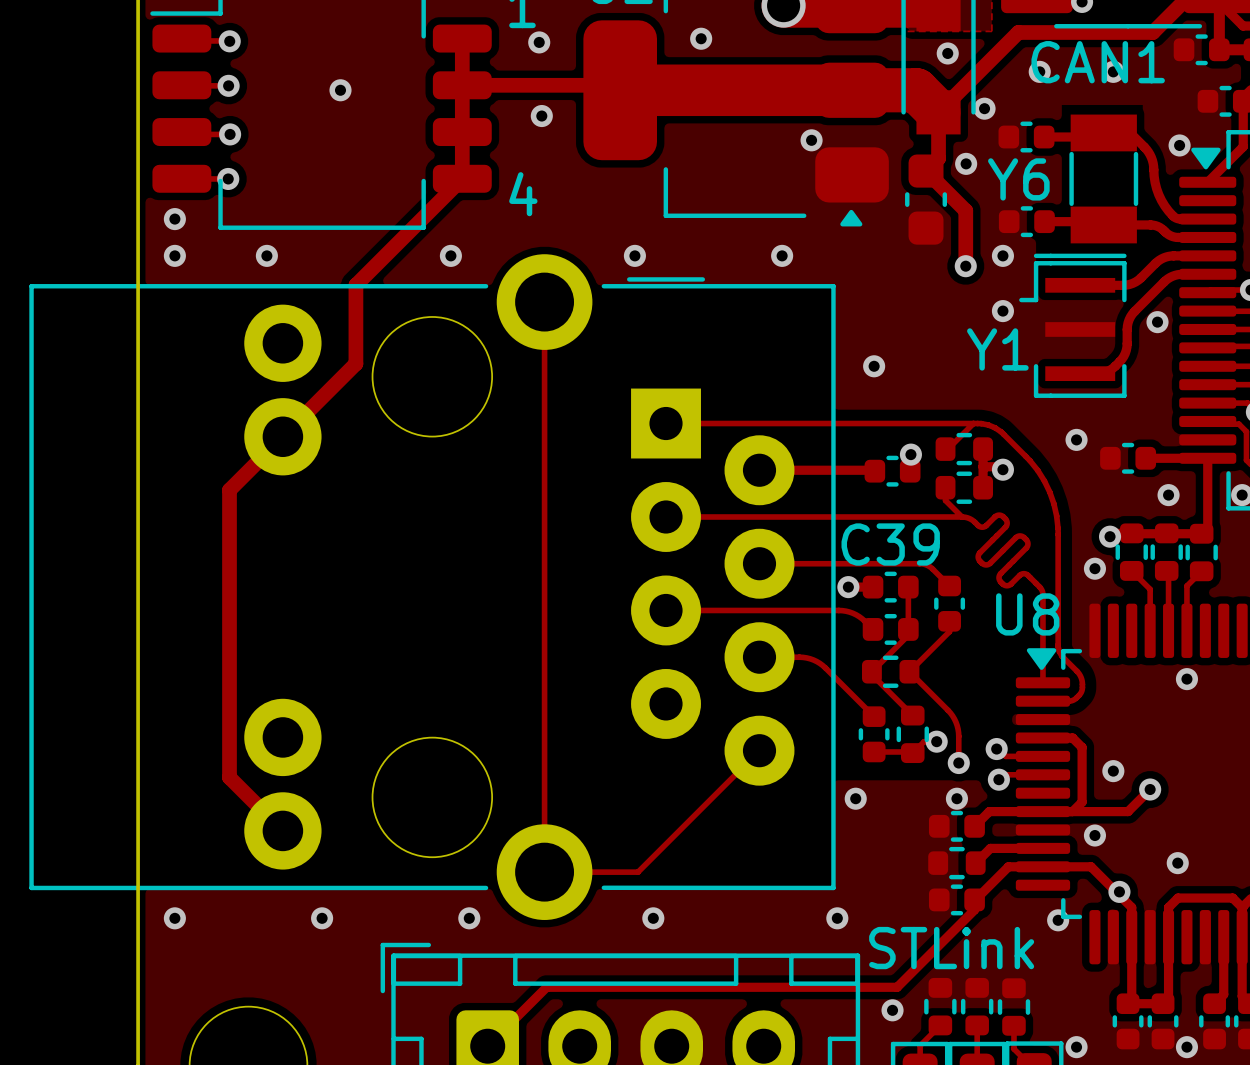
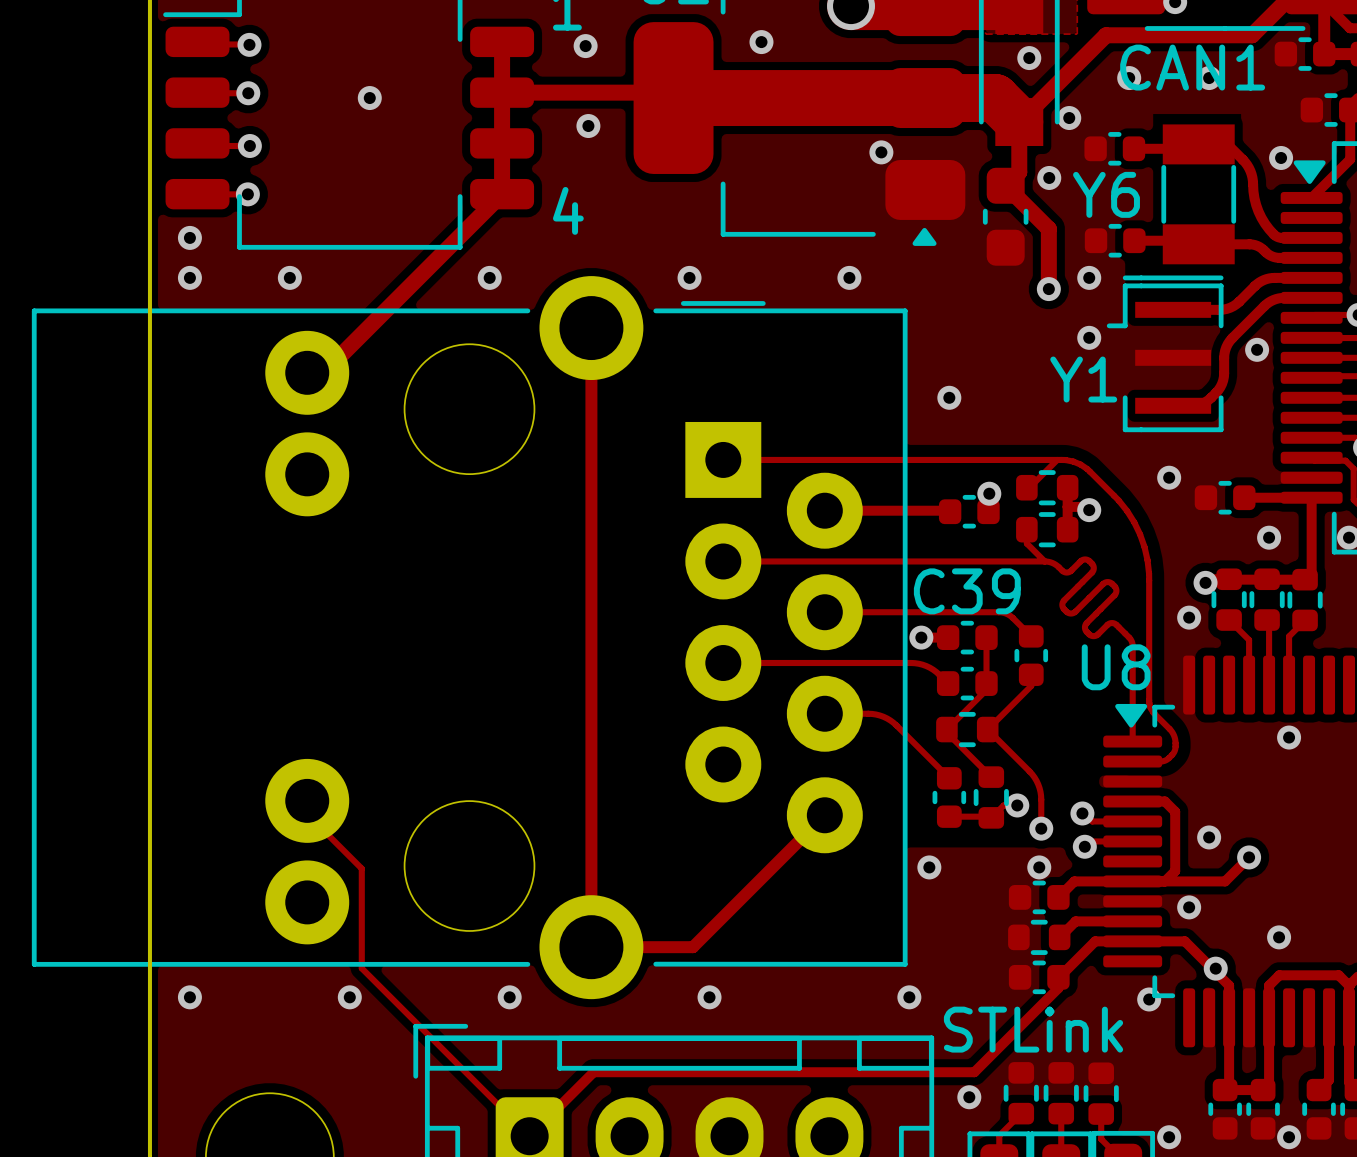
track: (355, 285) (355, 363) (229, 490) (229, 777) (282, 830) -> (386, 309) (323, 372) (307, 372)
track width: thin (544, 302) (544, 872) (638, 872) (759, 750) -> thick (591, 328) (591, 947) (692, 947) (824, 815)
track: none -> (307, 800) (307, 814) (361, 868) (361, 968) (529, 1136)

